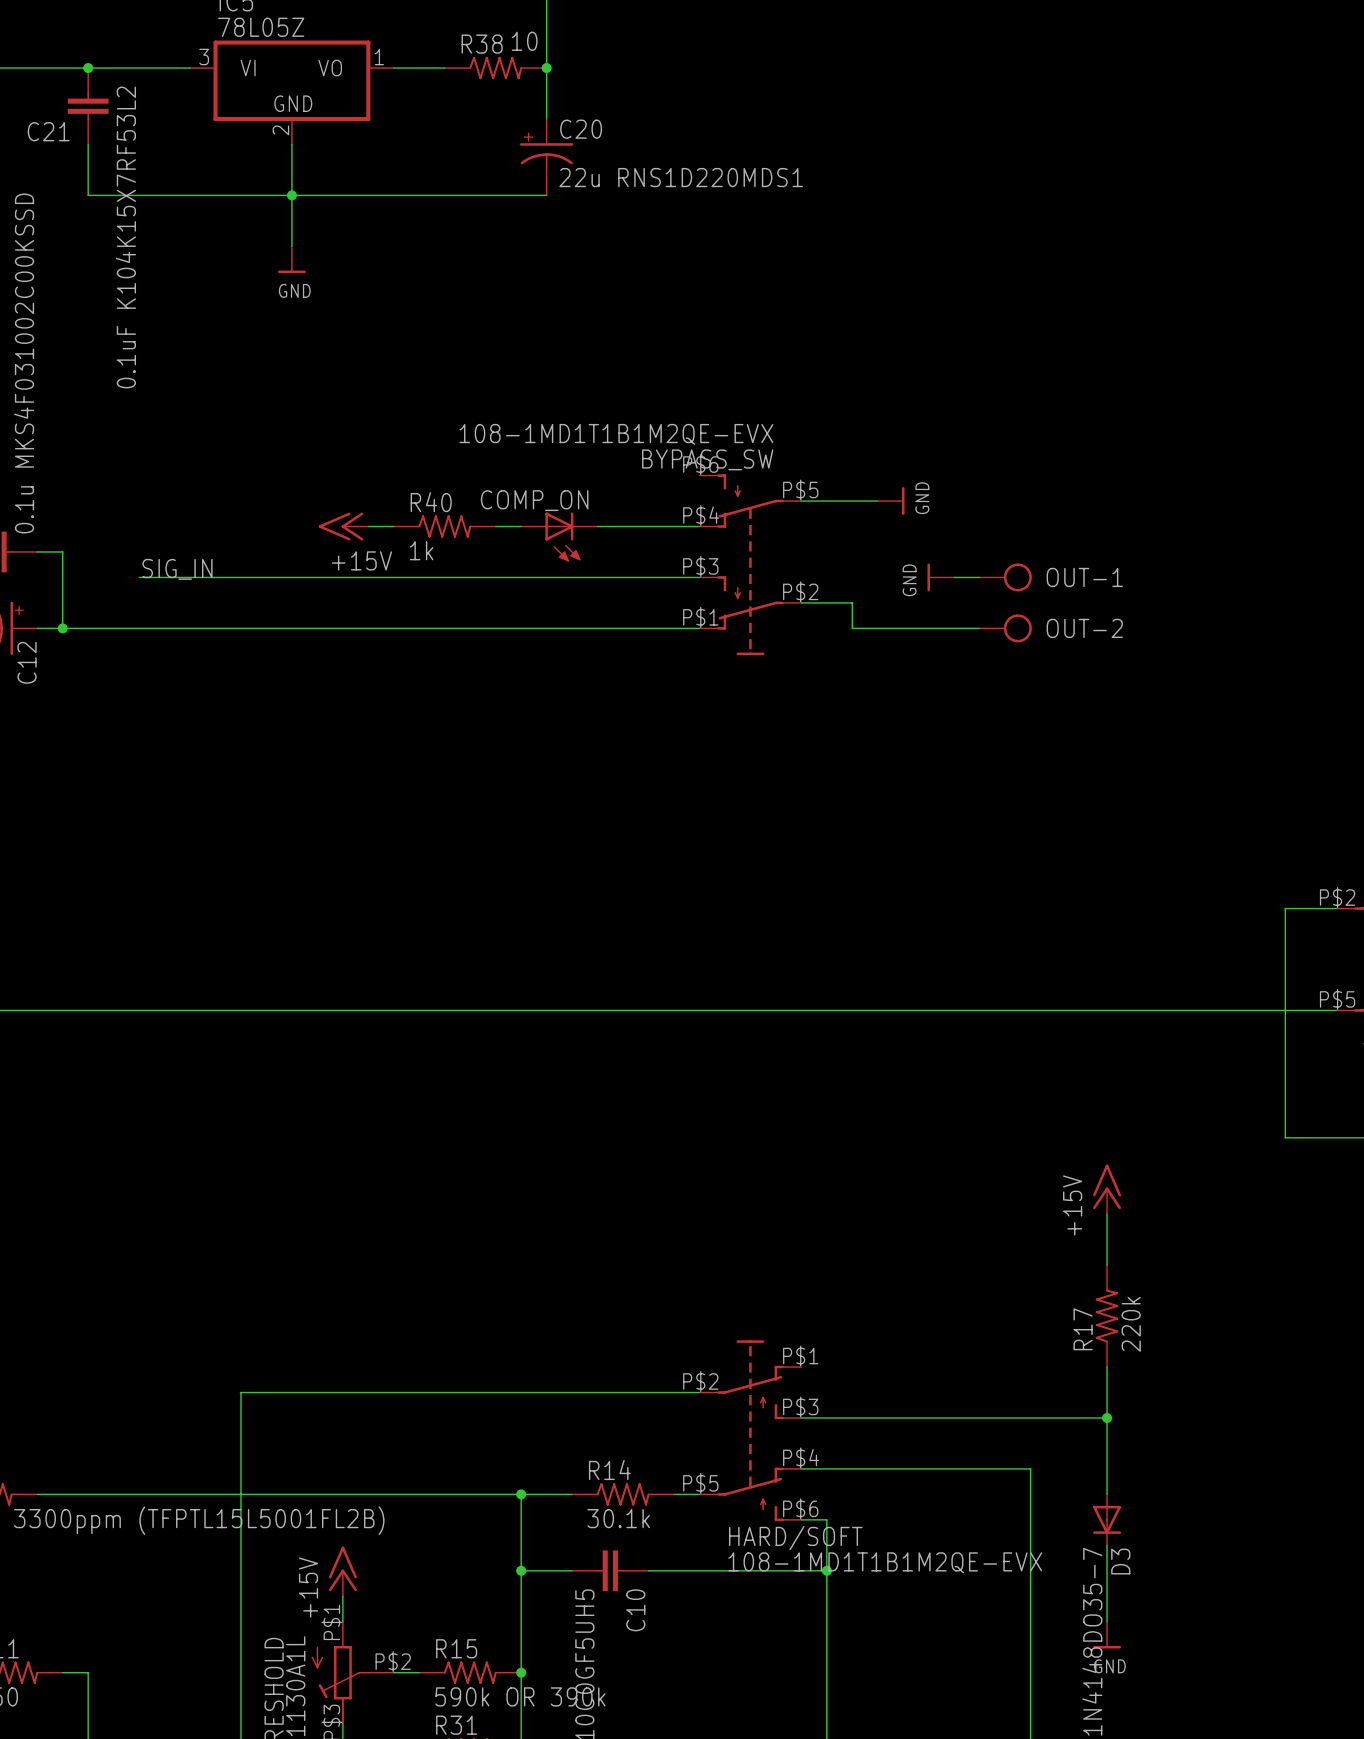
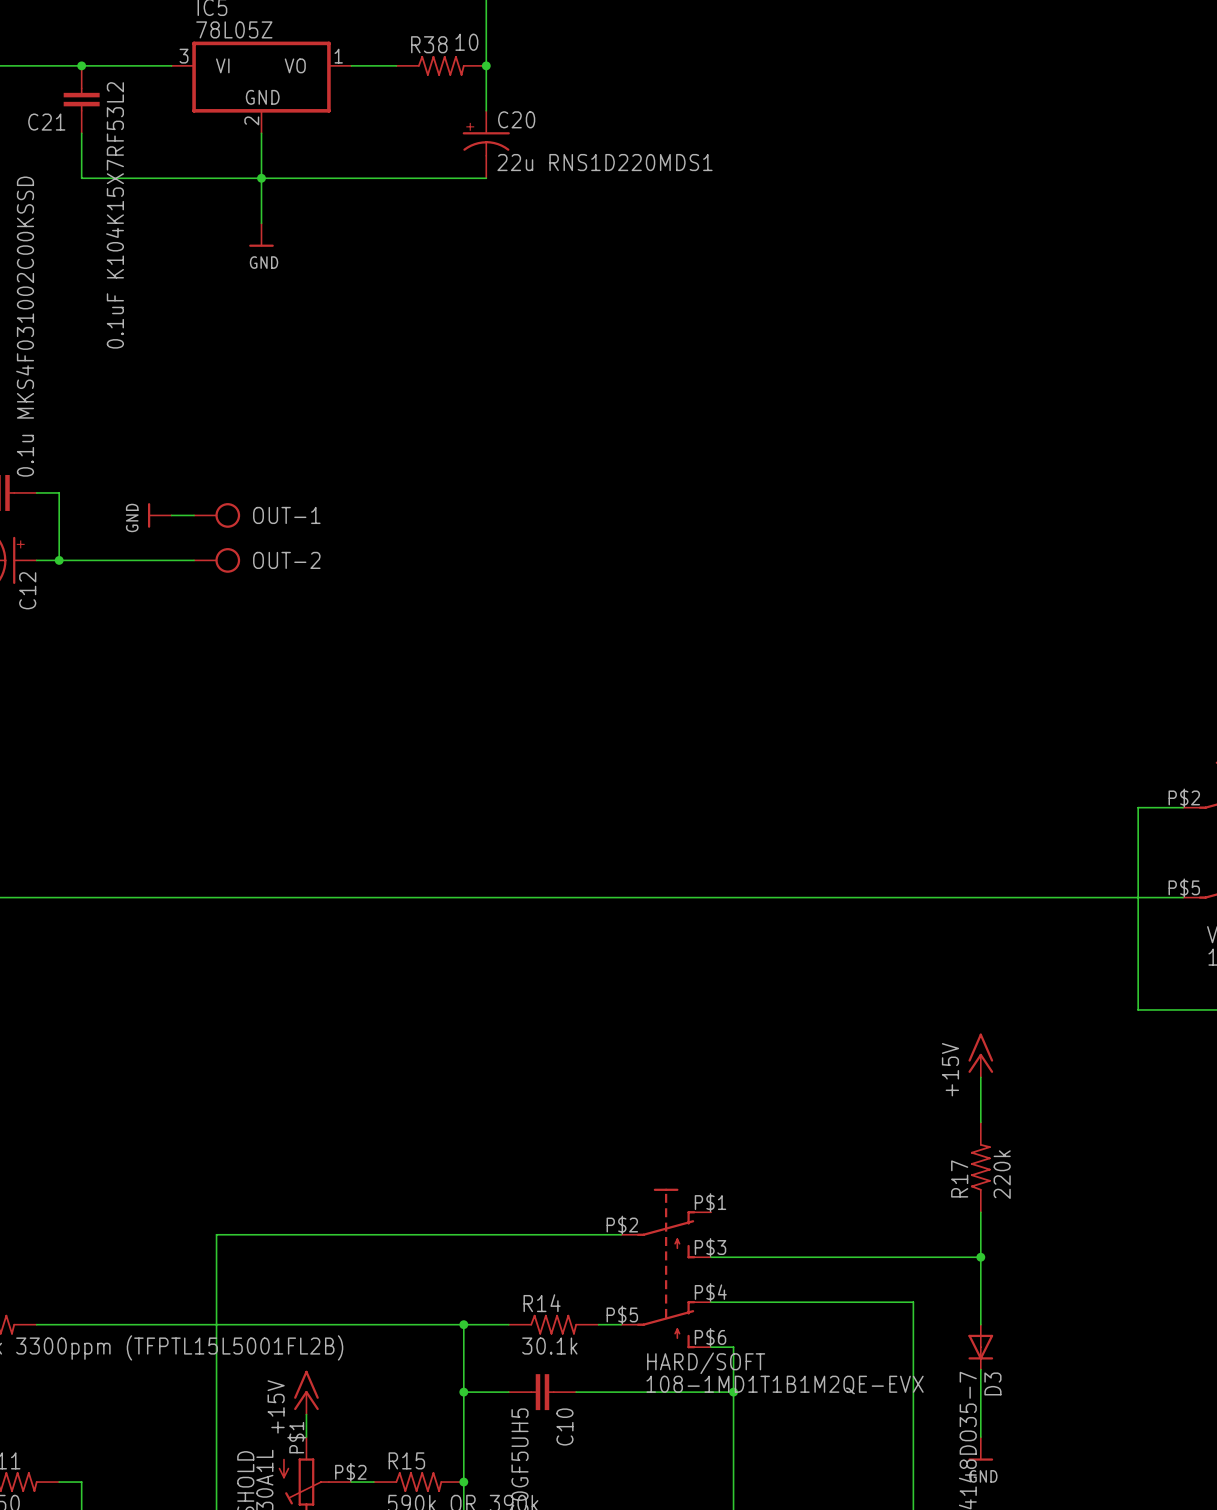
wire: (801, 501) (877, 501) -> none
power symbol: GND (891, 501) -> none
power symbol: +15V (343, 526) -> none
wire: (368, 526) (393, 526) -> none
R40: 1k (444, 526) -> none
wire: (495, 526) (521, 526) -> none
wire: (597, 526) (699, 526) -> none
COMP_ON: (559, 537) -> none
BYPASS_SW: 108-1MD1T1B1M2QE-EVX (750, 564) -> none
label: SIG_IN (177, 569) -> none
power symbol: none -> GND (159, 515)
wire: (215, 577) (699, 577) -> none
power symbol: GND (940, 577) -> none
wire: (954, 577) (979, 577) -> none
OUT-1 position: (1005, 577) -> (217, 515)
wire: (801, 602) (852, 602) (852, 628) (979, 628) -> none
wire: (215, 628) (699, 628) -> none
OUT-2 position: (1005, 628) -> (217, 560)

